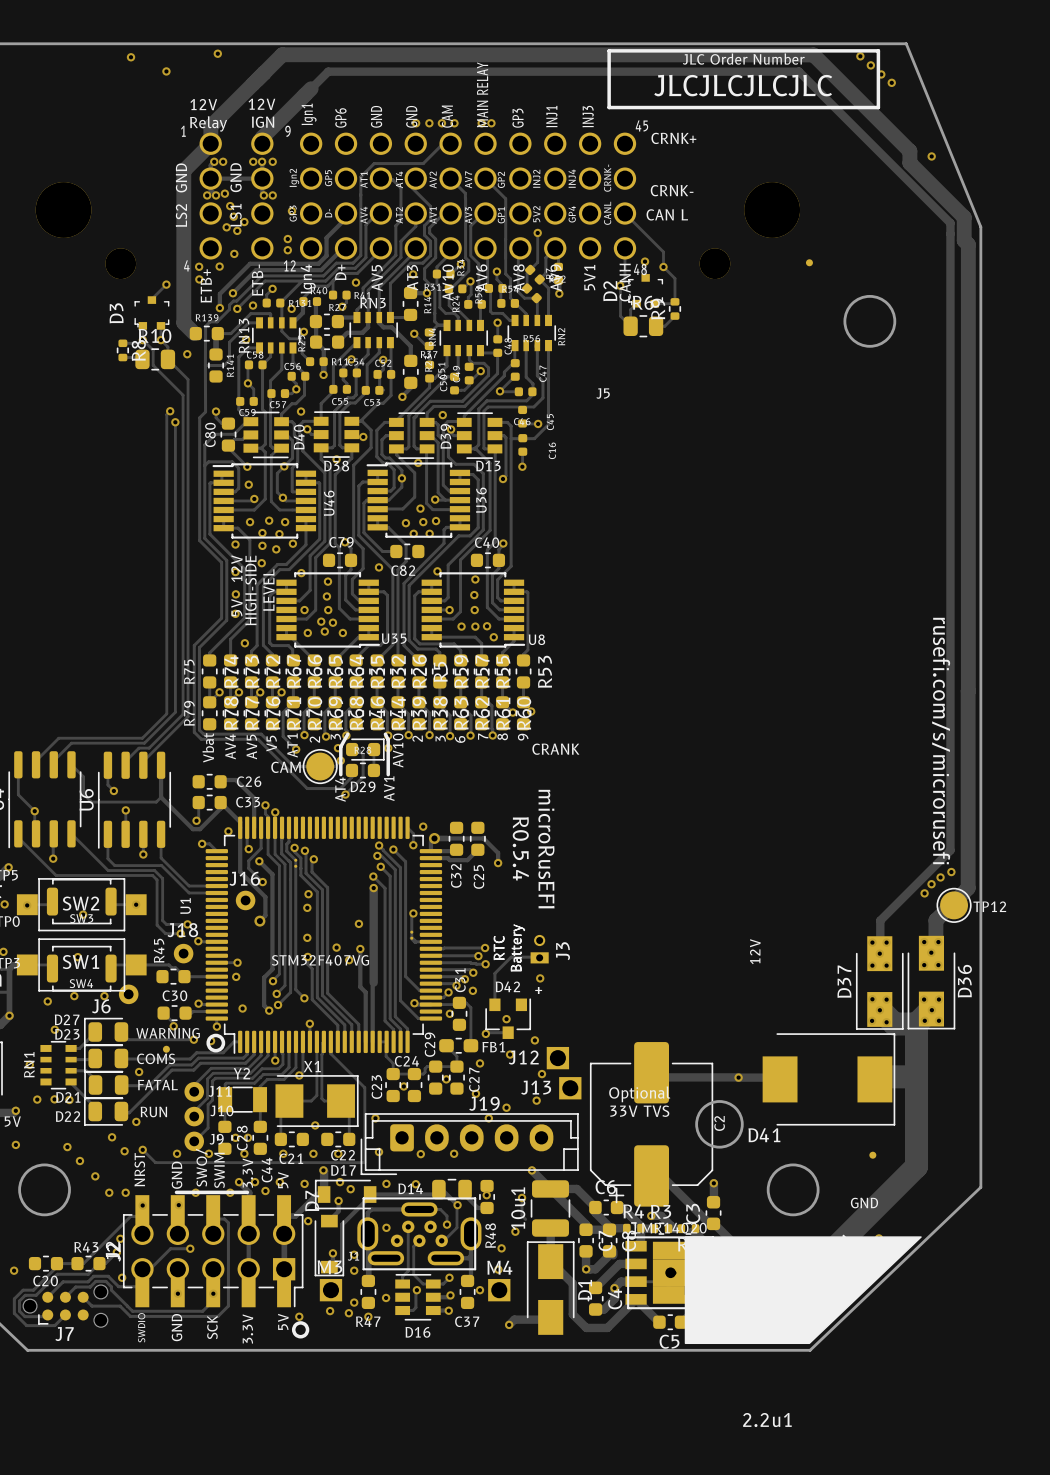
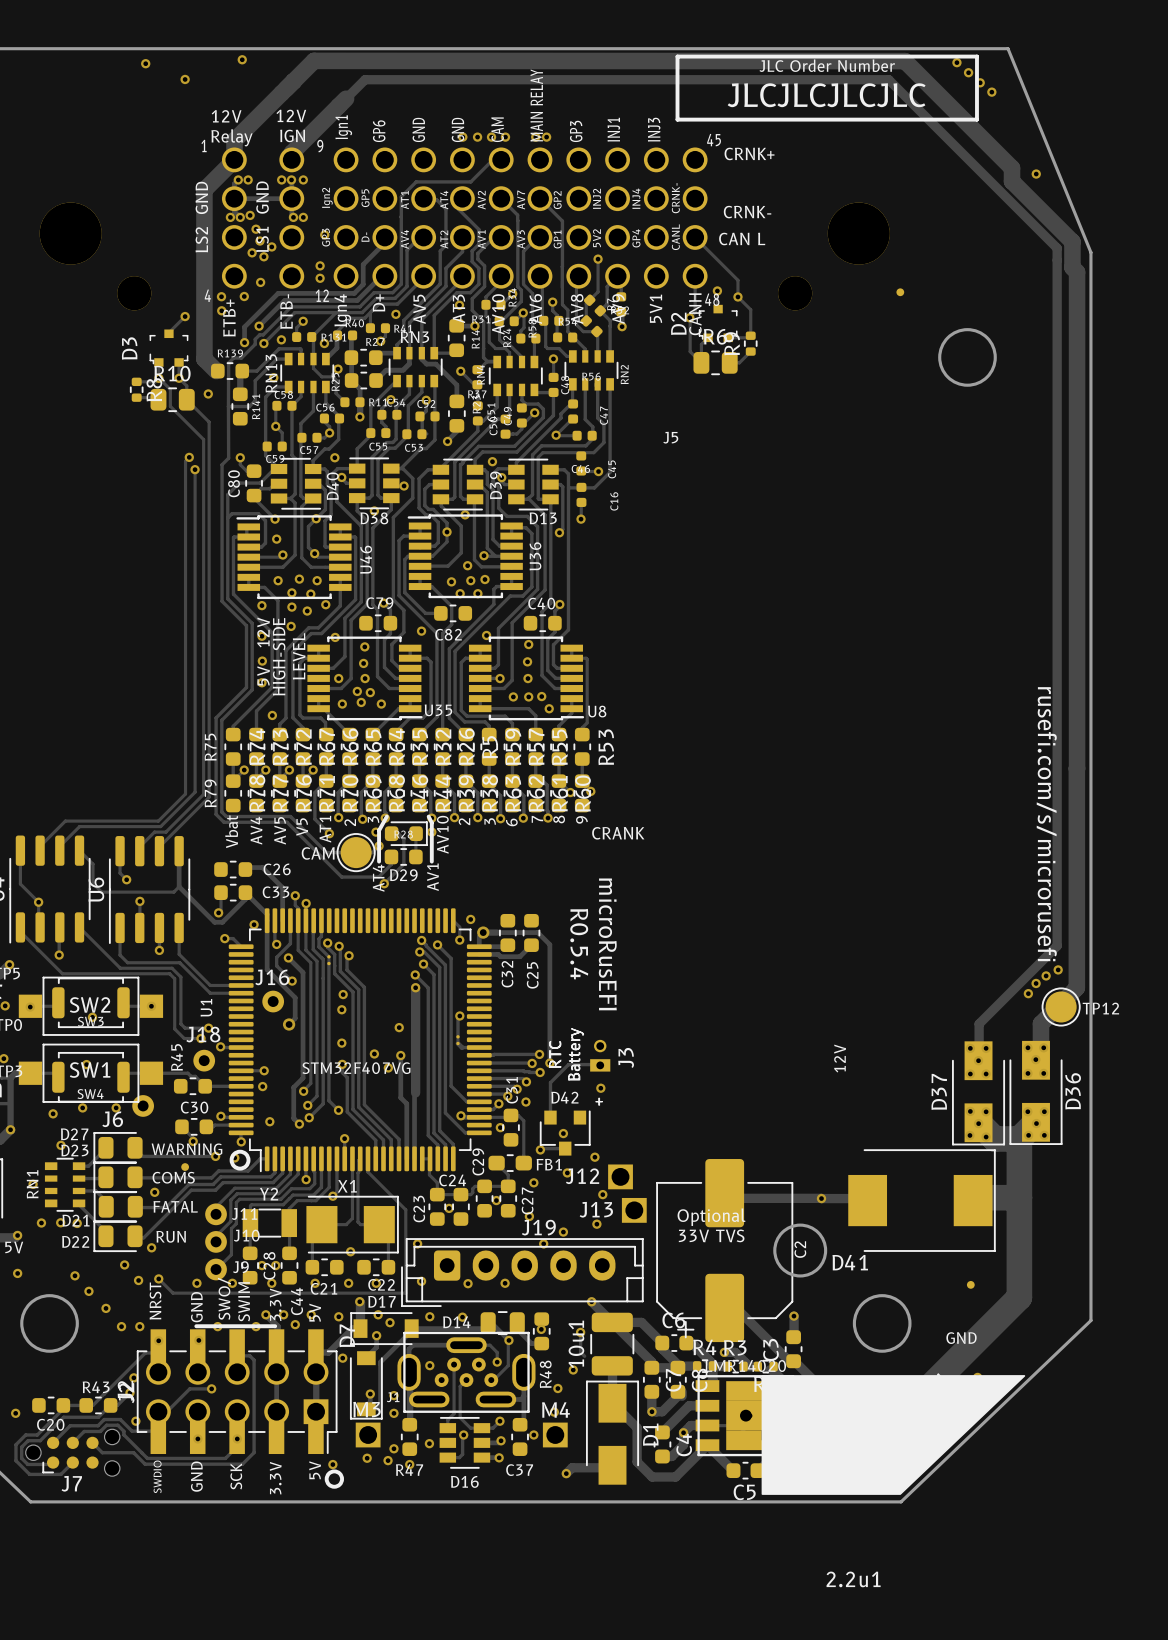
track: (494, 849) (498, 853) (498, 863) -> (549, 944) (549, 1063)
via: (498, 863) -> none
via: none -> (549, 1063)

